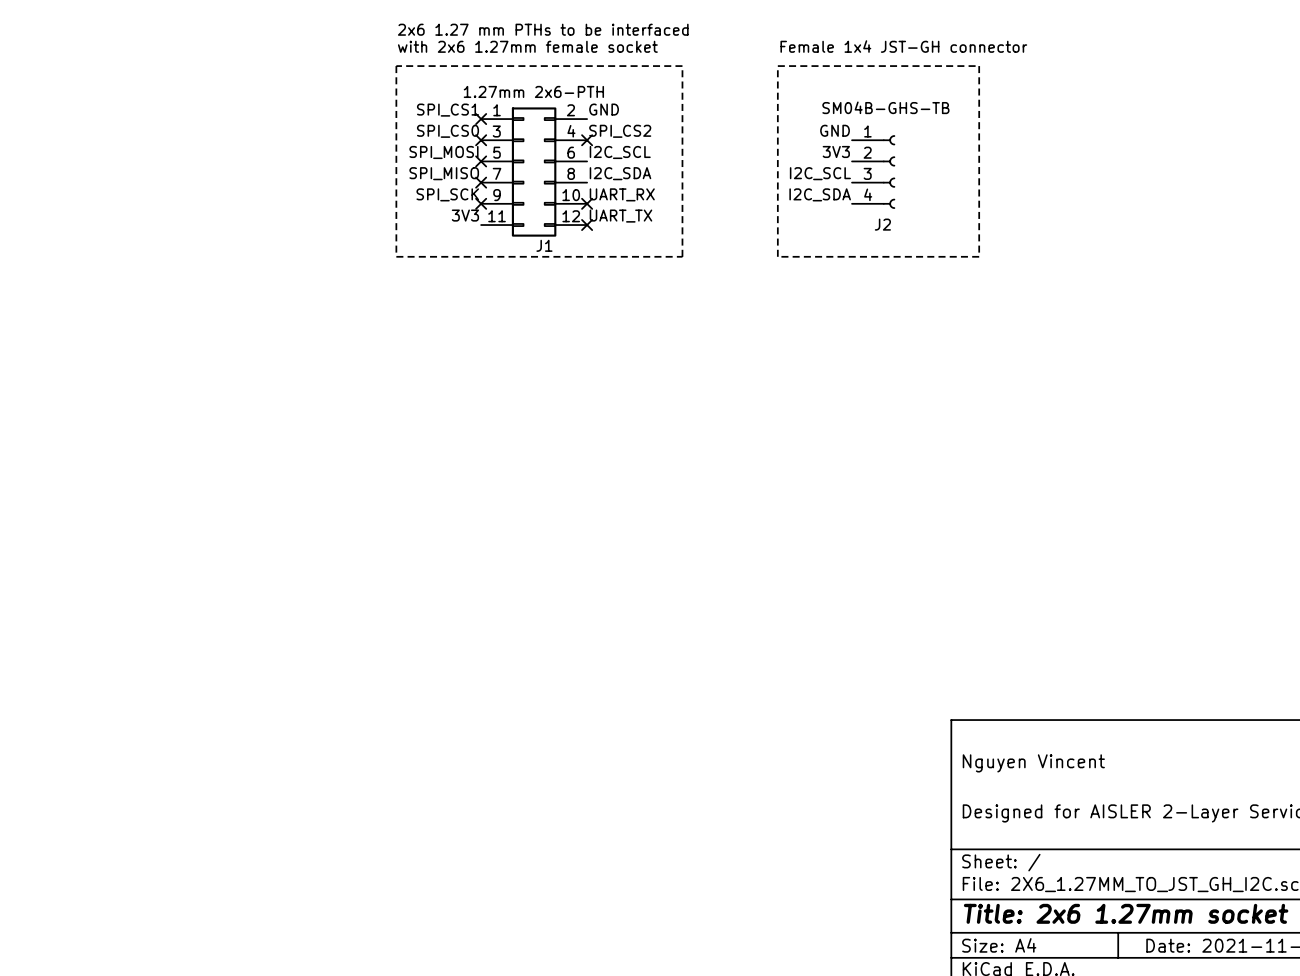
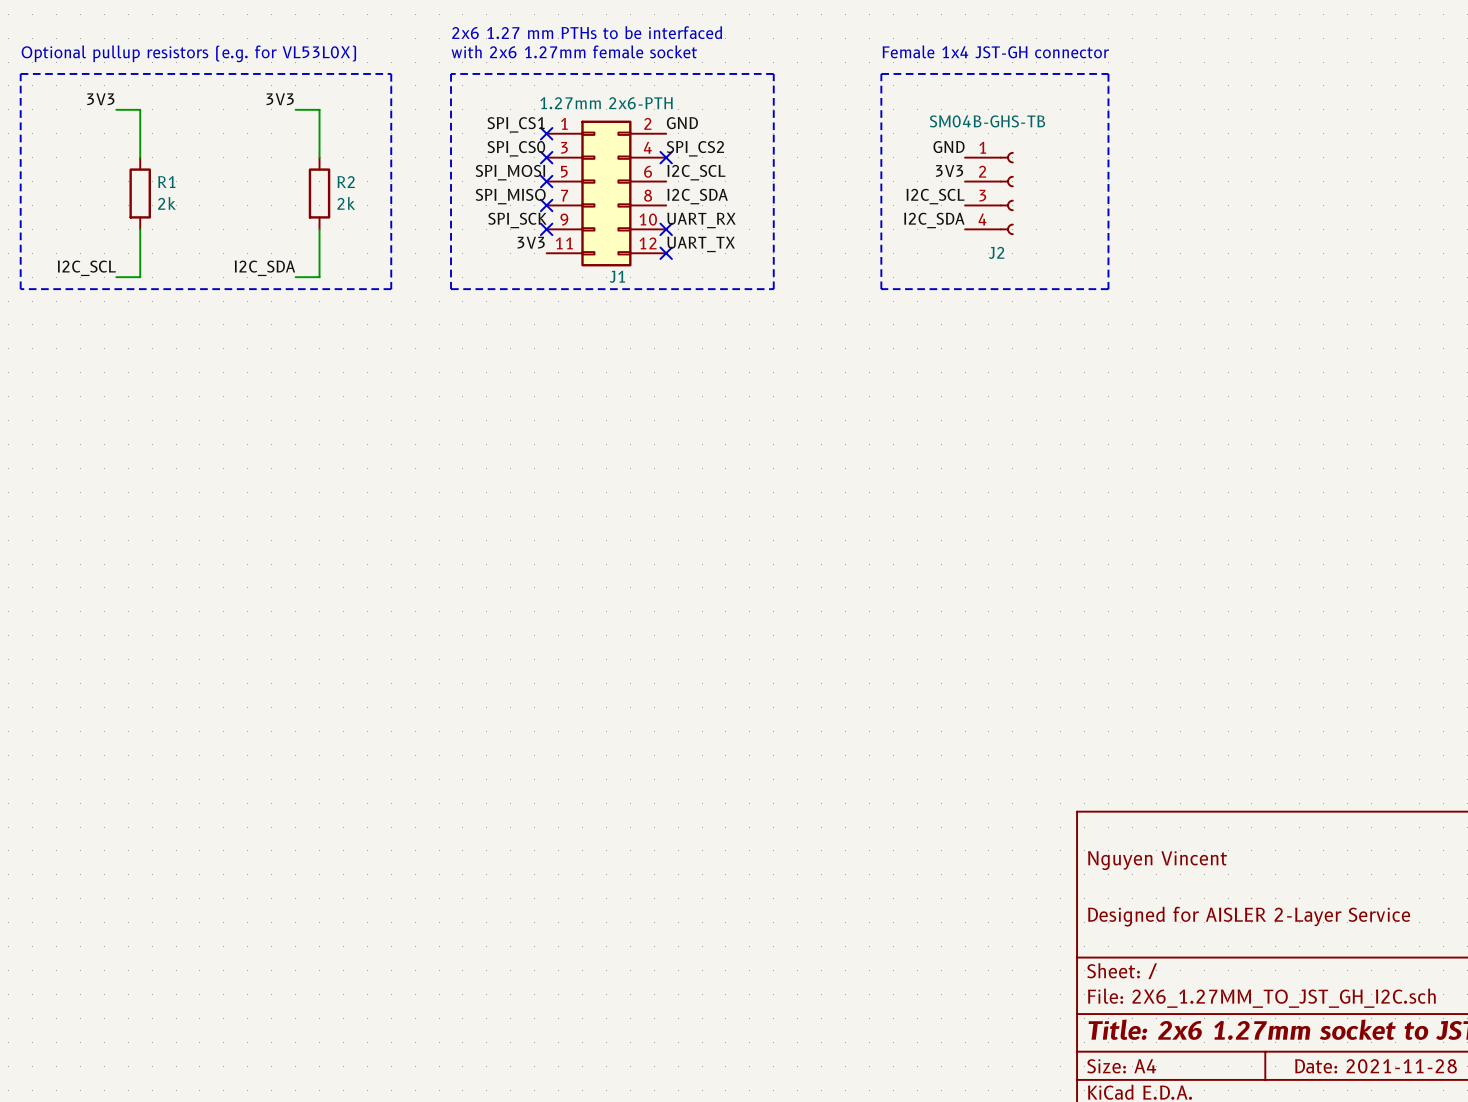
text: none -> Optional pullup resistors (e.g. for VL53L0X) (188, 53)
line: none -> (20, 73) (20, 289) (391, 289) (391, 73) (20, 73)
label: none -> 3V3 (100, 99)
label: none -> 3V3 (280, 99)
wire: none -> (116, 109) (140, 109) (140, 157)
wire: none -> (295, 109) (319, 109) (319, 157)
R1: none -> 2k (140, 193)
R2: none -> 2k (319, 193)
wire: none -> (140, 229) (140, 277) (116, 277)
wire: none -> (319, 229) (319, 277) (295, 277)
label: none -> I2C_SCL (86, 268)
label: none -> I2C_SDA (264, 268)

